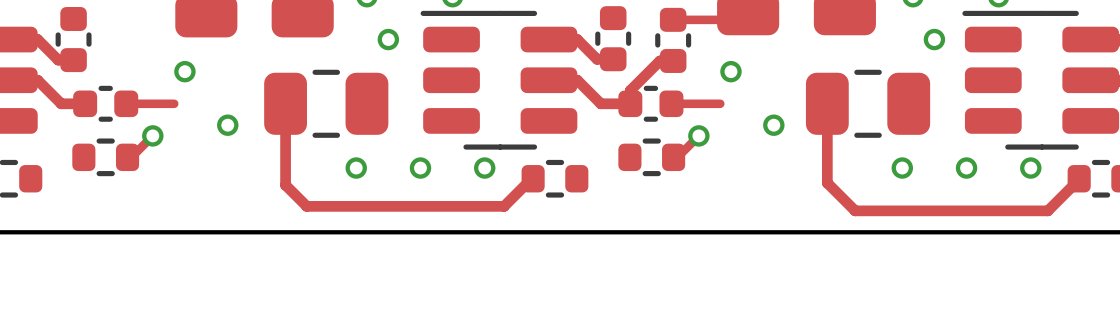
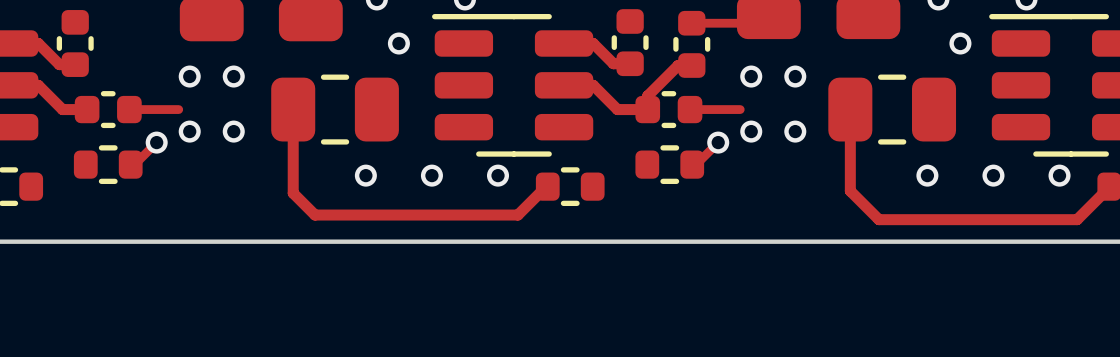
via: none -> (233, 76)
via: none -> (795, 76)
via: none -> (189, 131)
via: none -> (751, 131)

